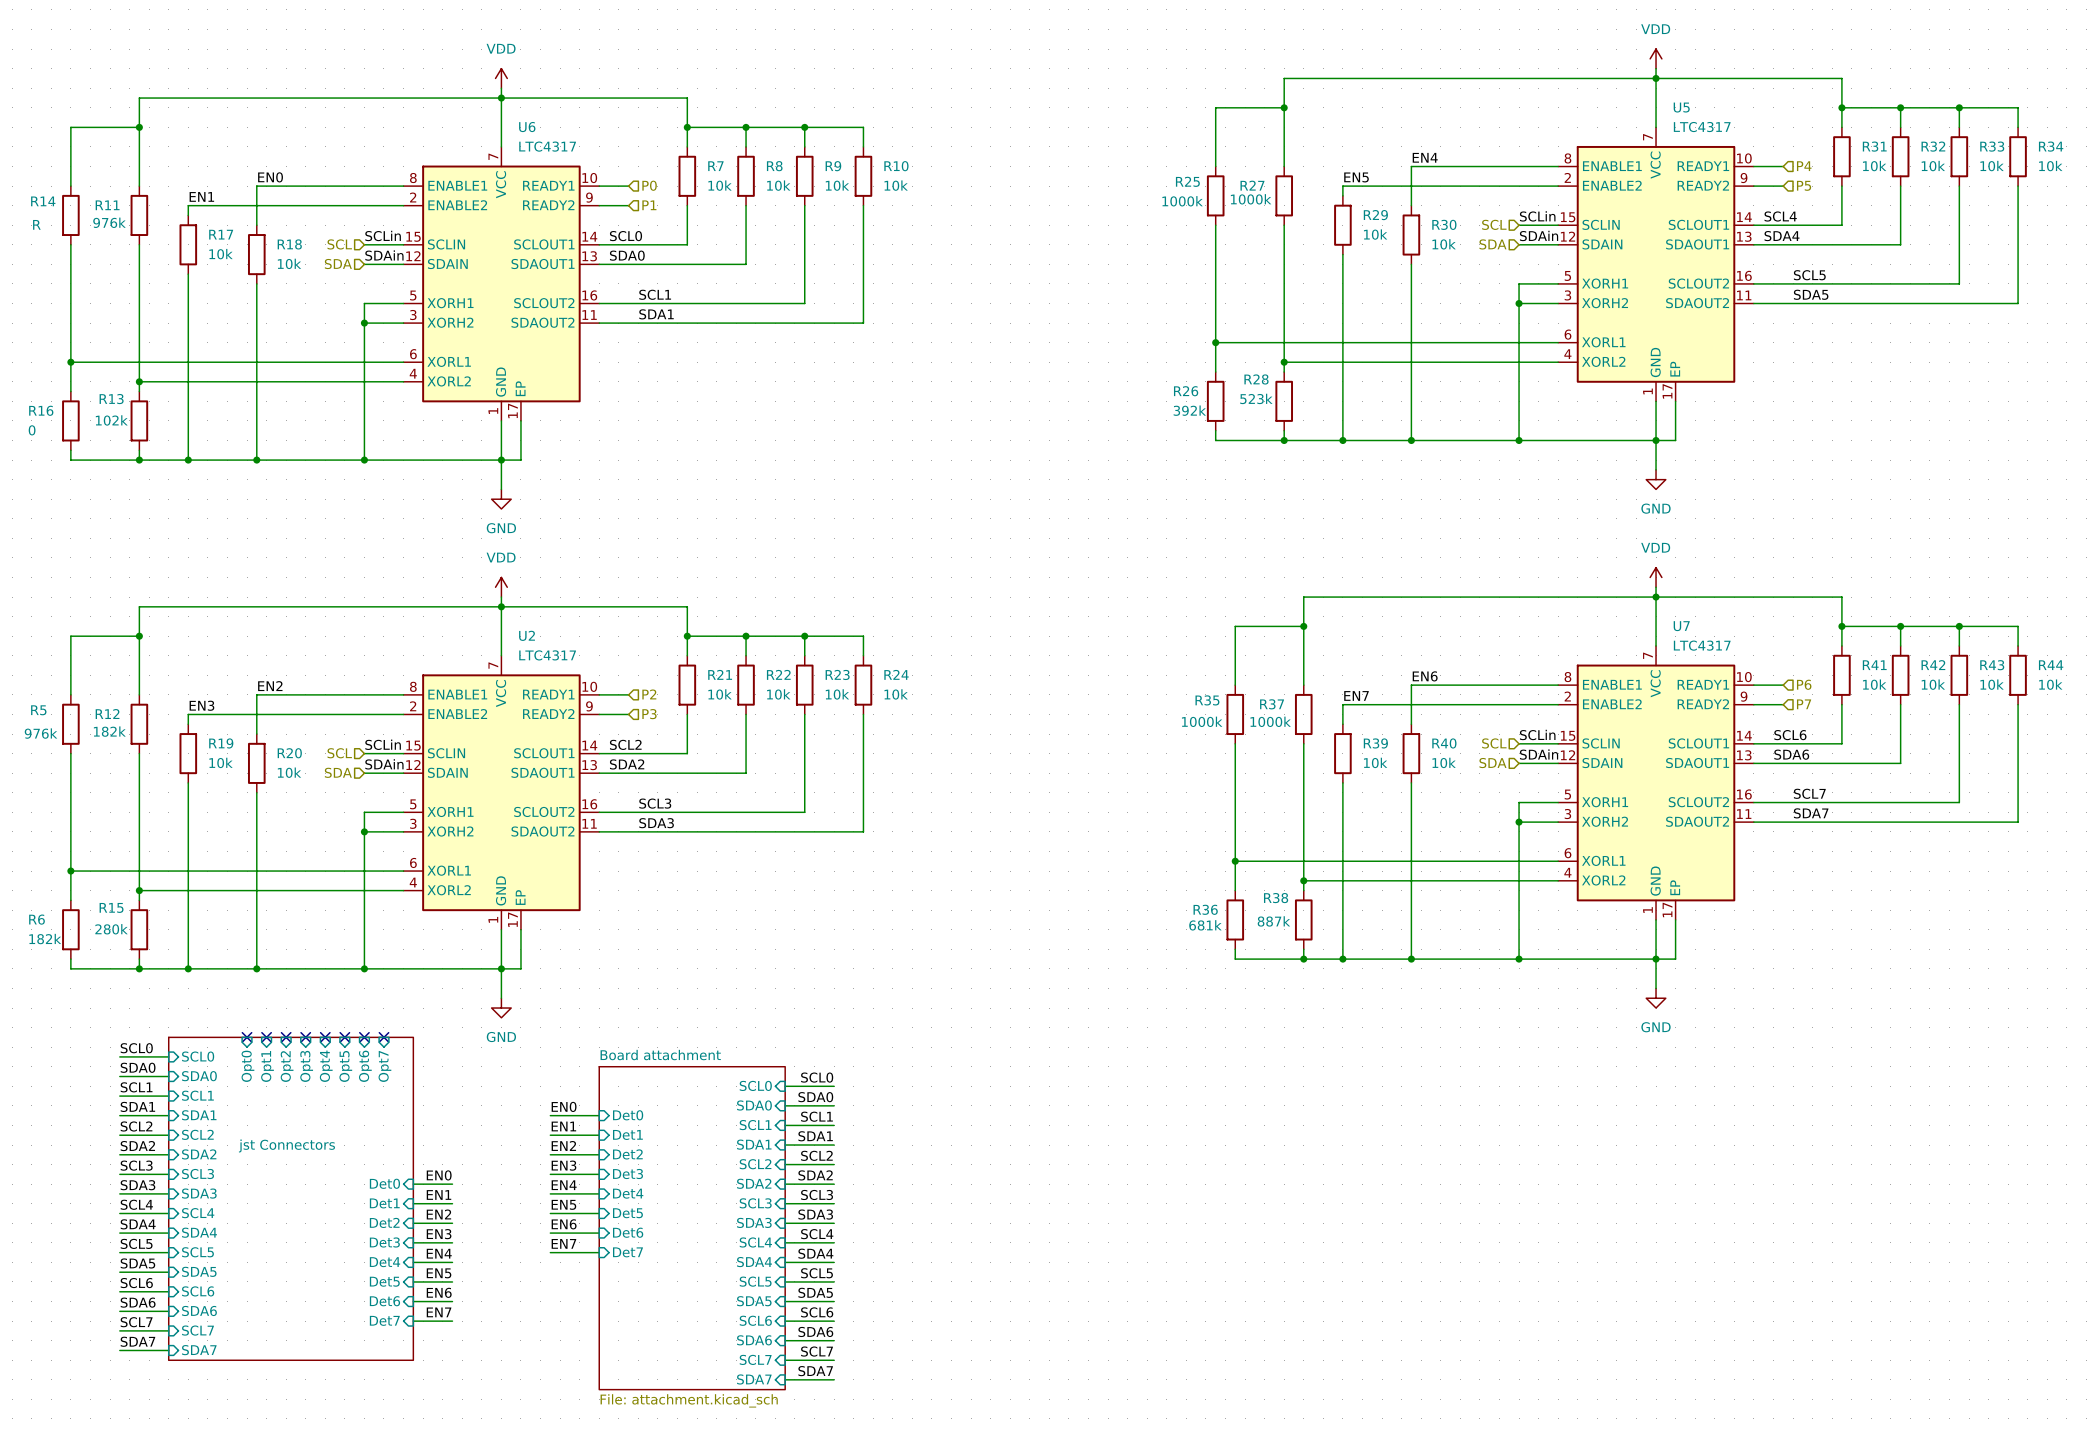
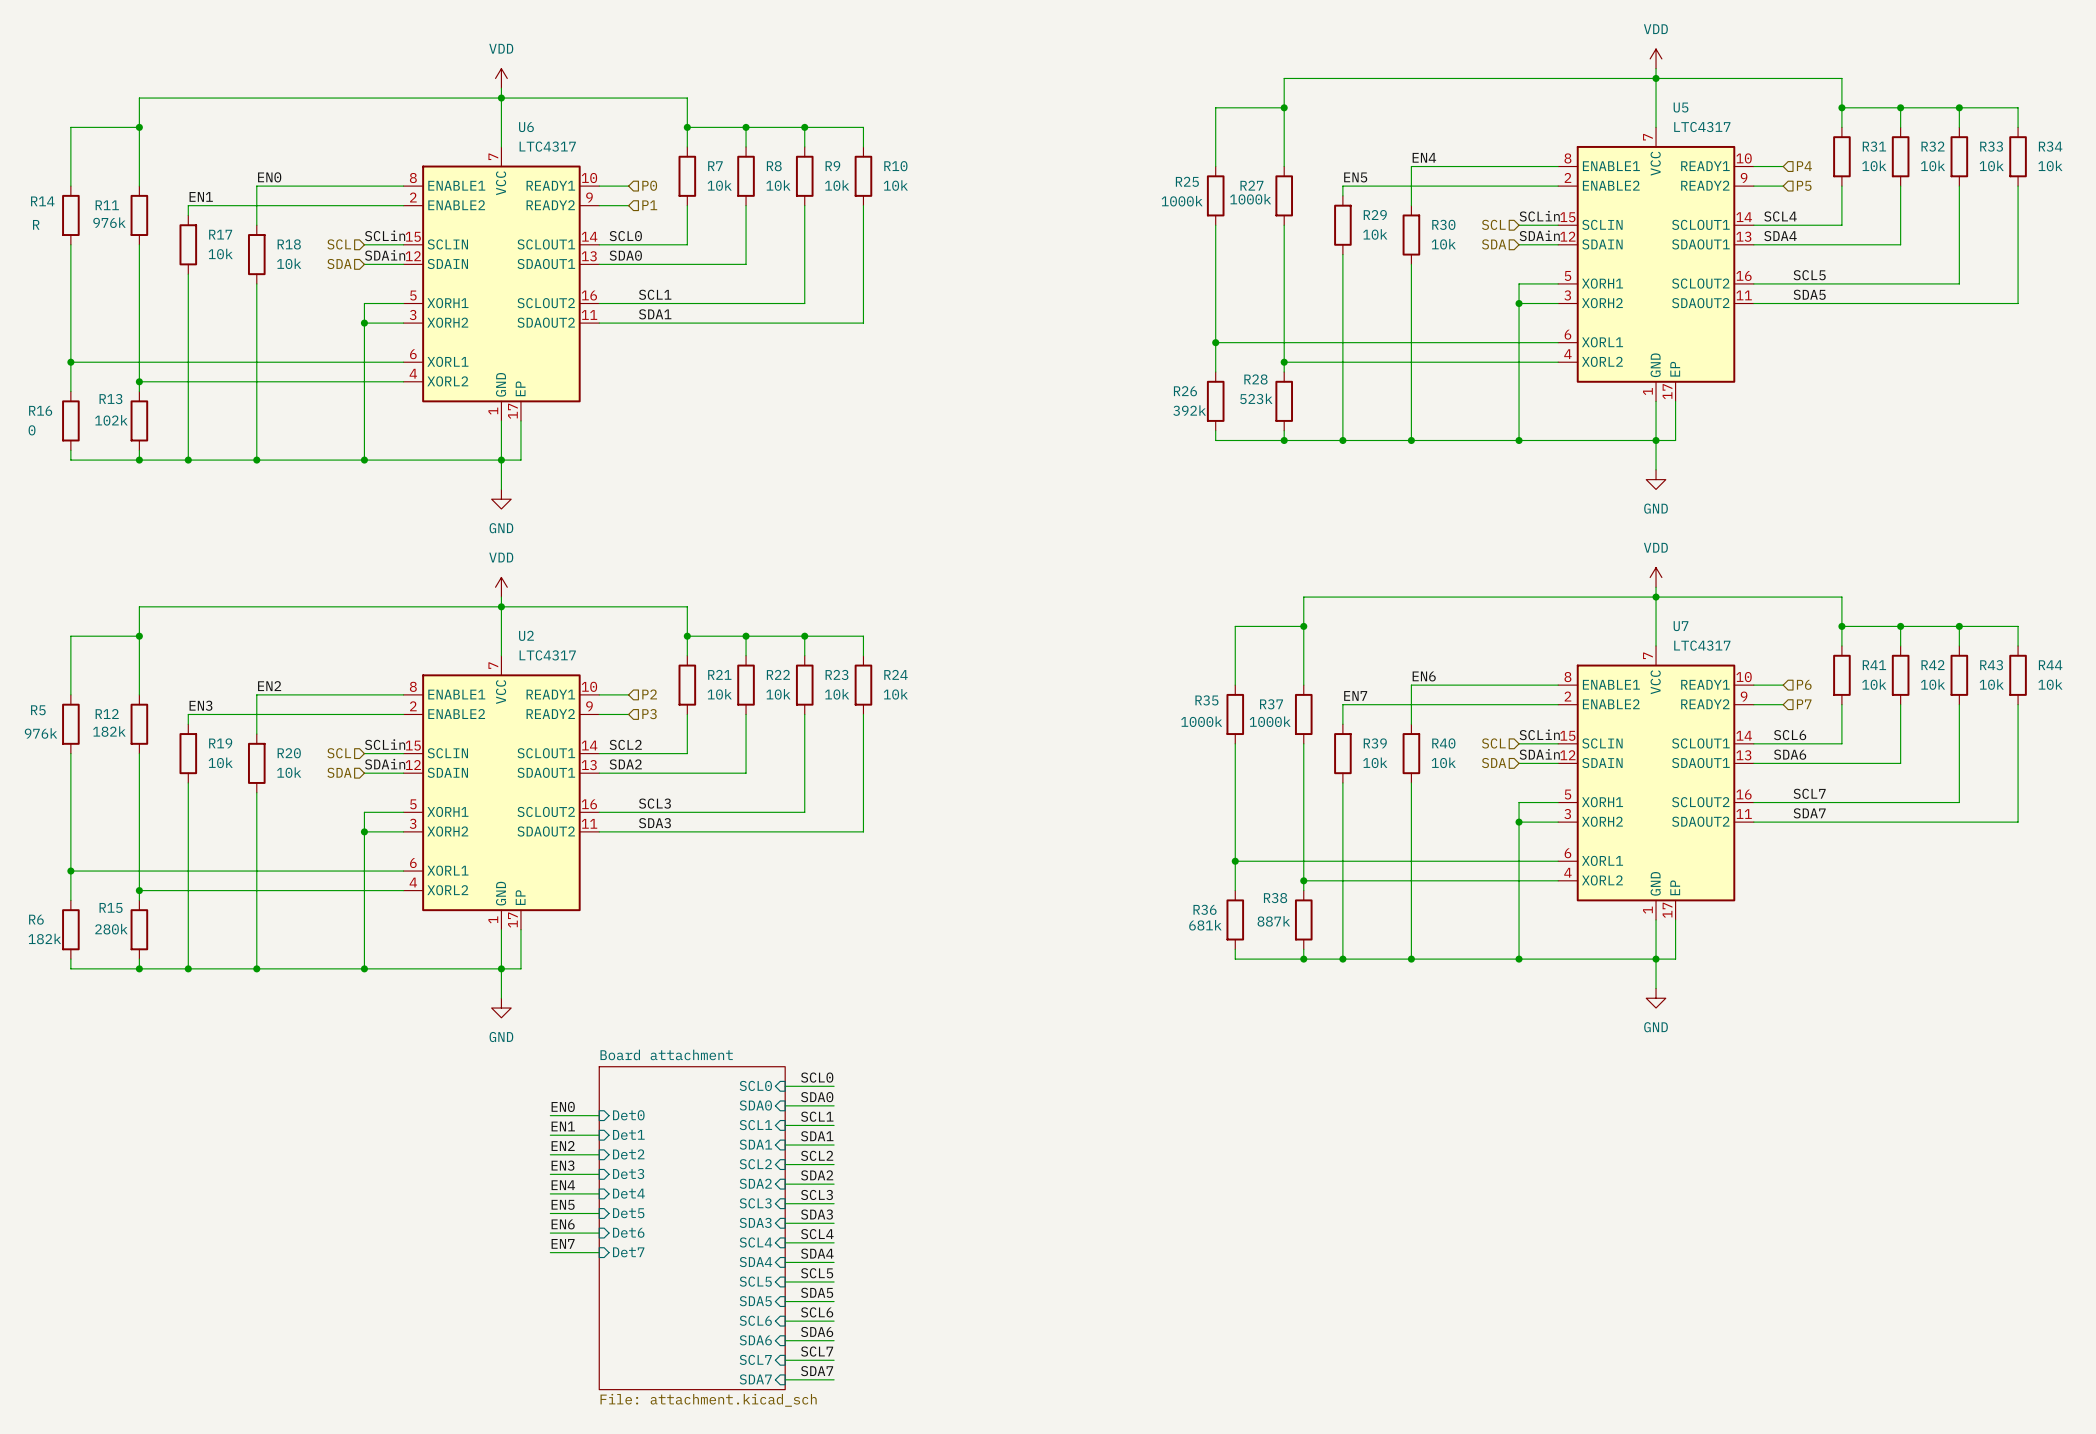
no-connect mark: (247, 1037) -> none
no-connect mark: (266, 1037) -> none
no-connect mark: (286, 1037) -> none
no-connect mark: (305, 1037) -> none
no-connect mark: (325, 1037) -> none
no-connect mark: (344, 1037) -> none
no-connect mark: (364, 1037) -> none
no-connect mark: (383, 1037) -> none
label: SCL0 (136, 1048) -> none
wire: (119, 1056) (168, 1056) -> none
sheet pin: SCL0 (198, 1056) -> none
sheet pin: Opt0 (247, 1066) -> none
sheet pin: Opt1 (267, 1066) -> none
sheet pin: Opt2 (287, 1066) -> none
sheet pin: Opt3 (306, 1066) -> none
sheet pin: Opt4 (326, 1066) -> none
sheet pin: Opt5 (345, 1066) -> none
sheet pin: Opt6 (365, 1066) -> none
sheet pin: Opt7 (384, 1066) -> none
label: SDA0 (138, 1067) -> none
wire: (119, 1076) (168, 1076) -> none
sheet pin: SDA0 (199, 1076) -> none
label: SCL1 (136, 1087) -> none
sheet pin: SCL1 (197, 1095) -> none
wire: (119, 1096) (168, 1096) -> none
label: SDA1 (137, 1106) -> none
wire: (119, 1115) (168, 1115) -> none
sheet pin: SDA1 (199, 1115) -> none
label: SCL2 (136, 1126) -> none
sheet pin: SCL2 (197, 1134) -> none
wire: (119, 1135) (168, 1135) -> none
label: SDA2 (137, 1146) -> none
wire: (119, 1154) (168, 1154) -> none
sheet pin: SDA2 (199, 1154) -> none
label: SCL3 (136, 1165) -> none
wire: (119, 1174) (168, 1174) -> none
sheet pin: SCL3 (198, 1174) -> none
label: EN0 (439, 1175) -> none
sheet pin: Det0 (384, 1183) -> none
wire: (413, 1184) (452, 1184) -> none
label: SDA3 (137, 1185) -> none
wire: (119, 1193) (168, 1193) -> none
sheet pin: SDA3 (199, 1193) -> none
label: EN1 (438, 1194) -> none
sheet jst Connectors: (291, 1198) -> none
sheet pin: Det1 (384, 1203) -> none
wire: (413, 1203) (452, 1203) -> none
label: SCL4 (136, 1204) -> none
wire: (119, 1213) (168, 1213) -> none
sheet pin: SCL4 (198, 1213) -> none
label: EN2 (438, 1214) -> none
sheet pin: Det2 (384, 1222) -> none
wire: (413, 1223) (452, 1223) -> none
label: SDA4 (138, 1224) -> none
sheet pin: SDA4 (199, 1232) -> none
wire: (119, 1233) (168, 1233) -> none
label: EN3 (439, 1234) -> none
sheet pin: Det3 (384, 1242) -> none
wire: (413, 1242) (452, 1242) -> none
label: SCL5 (136, 1243) -> none
wire: (119, 1252) (168, 1252) -> none
sheet pin: SCL5 (197, 1252) -> none
label: EN4 (439, 1253) -> none
sheet pin: Det4 (385, 1262) -> none
wire: (413, 1262) (452, 1262) -> none
label: SDA5 (137, 1263) -> none
sheet pin: SDA5 (199, 1271) -> none
wire: (119, 1272) (168, 1272) -> none
label: EN5 (439, 1273) -> none
sheet pin: Det5 (384, 1281) -> none
wire: (413, 1281) (452, 1281) -> none
label: SCL6 (136, 1283) -> none
wire: (119, 1291) (168, 1291) -> none
sheet pin: SCL6 (198, 1291) -> none
label: EN6 (439, 1292) -> none
sheet pin: Det6 (384, 1301) -> none
wire: (413, 1301) (452, 1301) -> none
label: SDA6 (138, 1302) -> none
sheet pin: SDA6 (199, 1310) -> none
wire: (119, 1311) (168, 1311) -> none
label: EN7 (439, 1312) -> none
sheet pin: Det7 (384, 1320) -> none
wire: (413, 1321) (452, 1321) -> none
label: SCL7 (136, 1322) -> none
wire: (119, 1330) (168, 1330) -> none
sheet pin: SCL7 (197, 1330) -> none
label: SDA7 (137, 1341) -> none
wire: (119, 1350) (168, 1350) -> none
sheet pin: SDA7 (199, 1350) -> none

